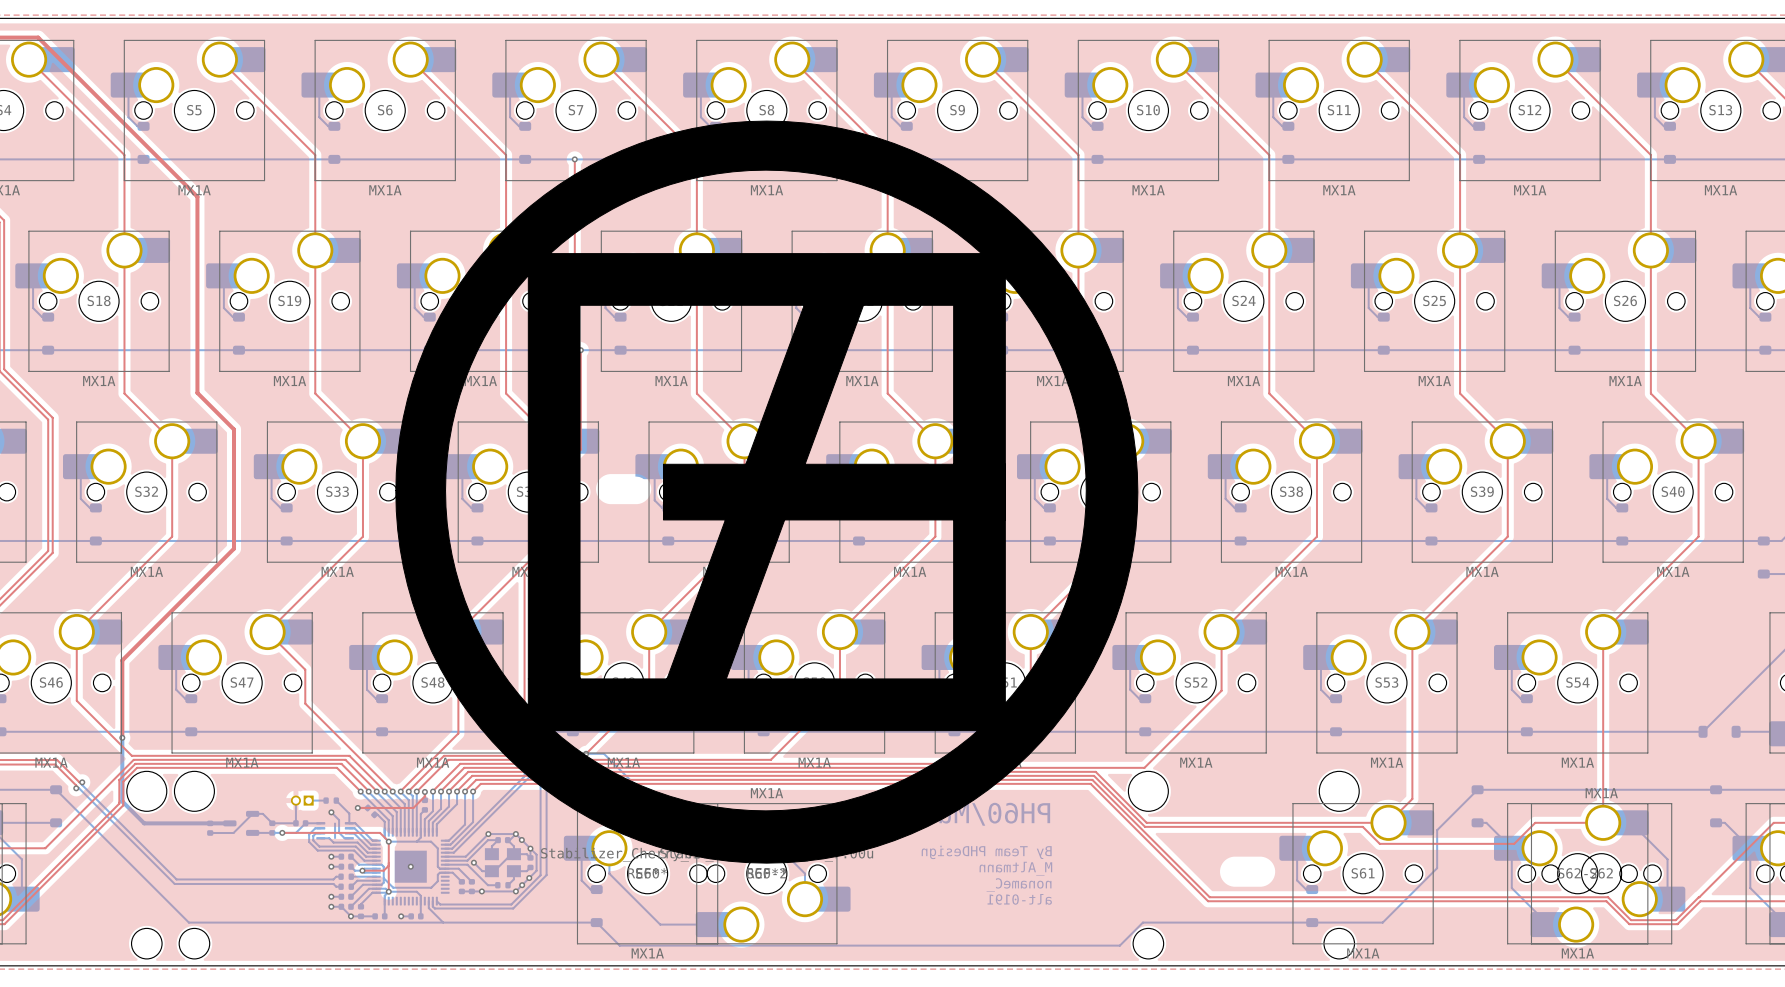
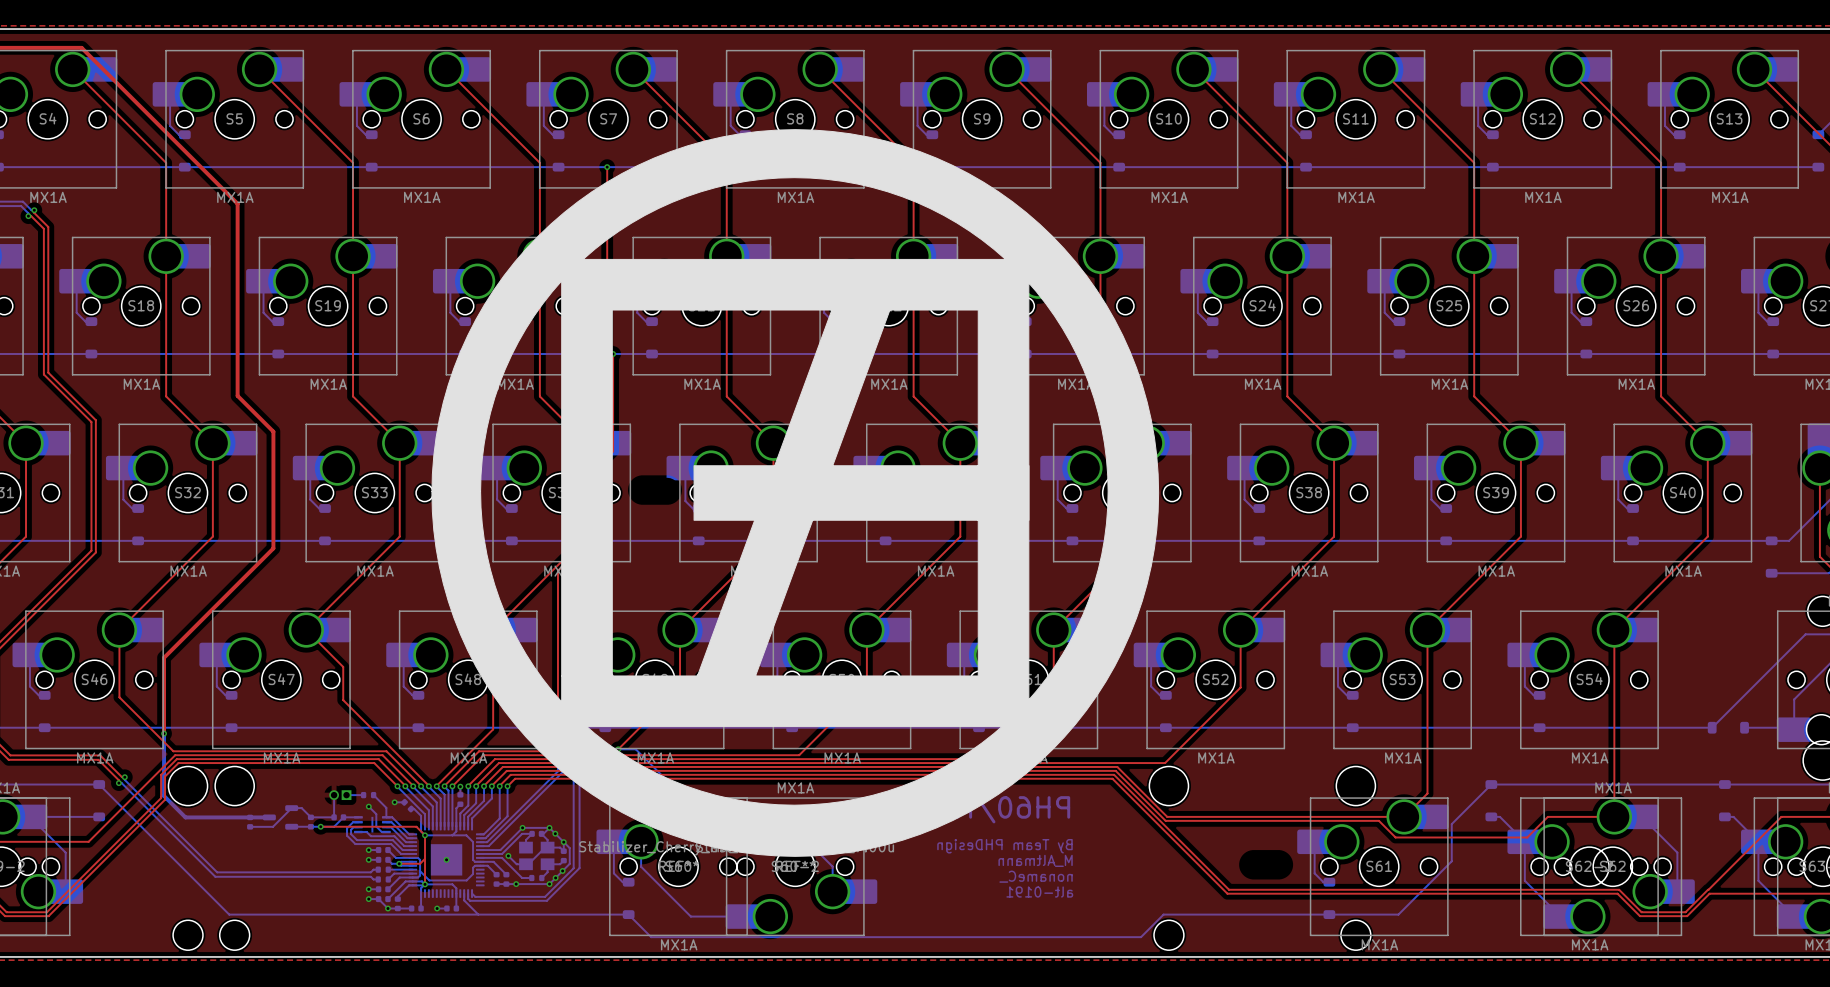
top track: (424, 791) (424, 796) (413, 807) (357, 807) -> none

